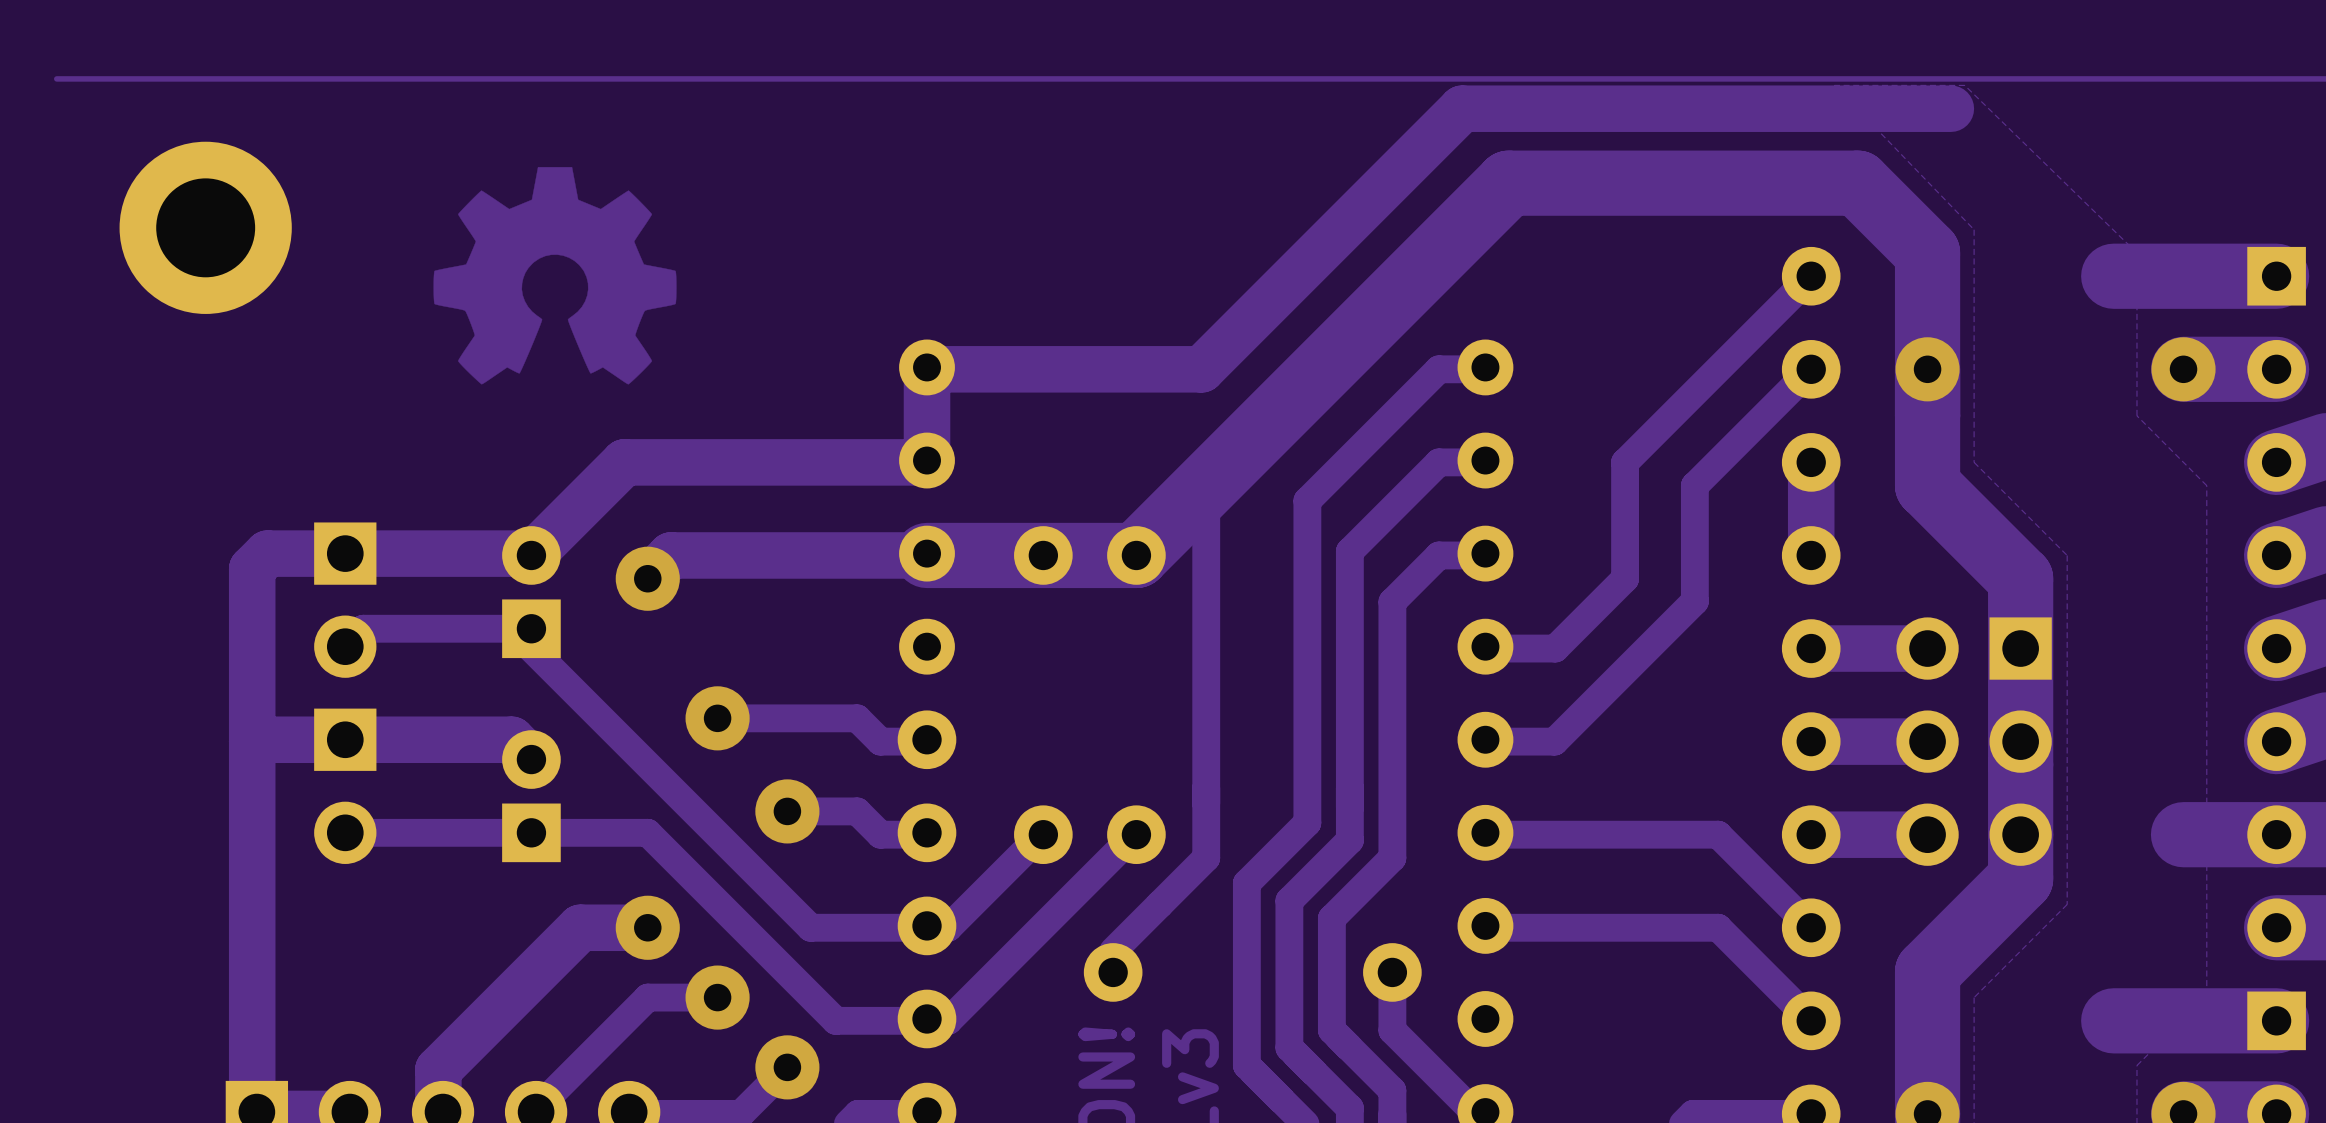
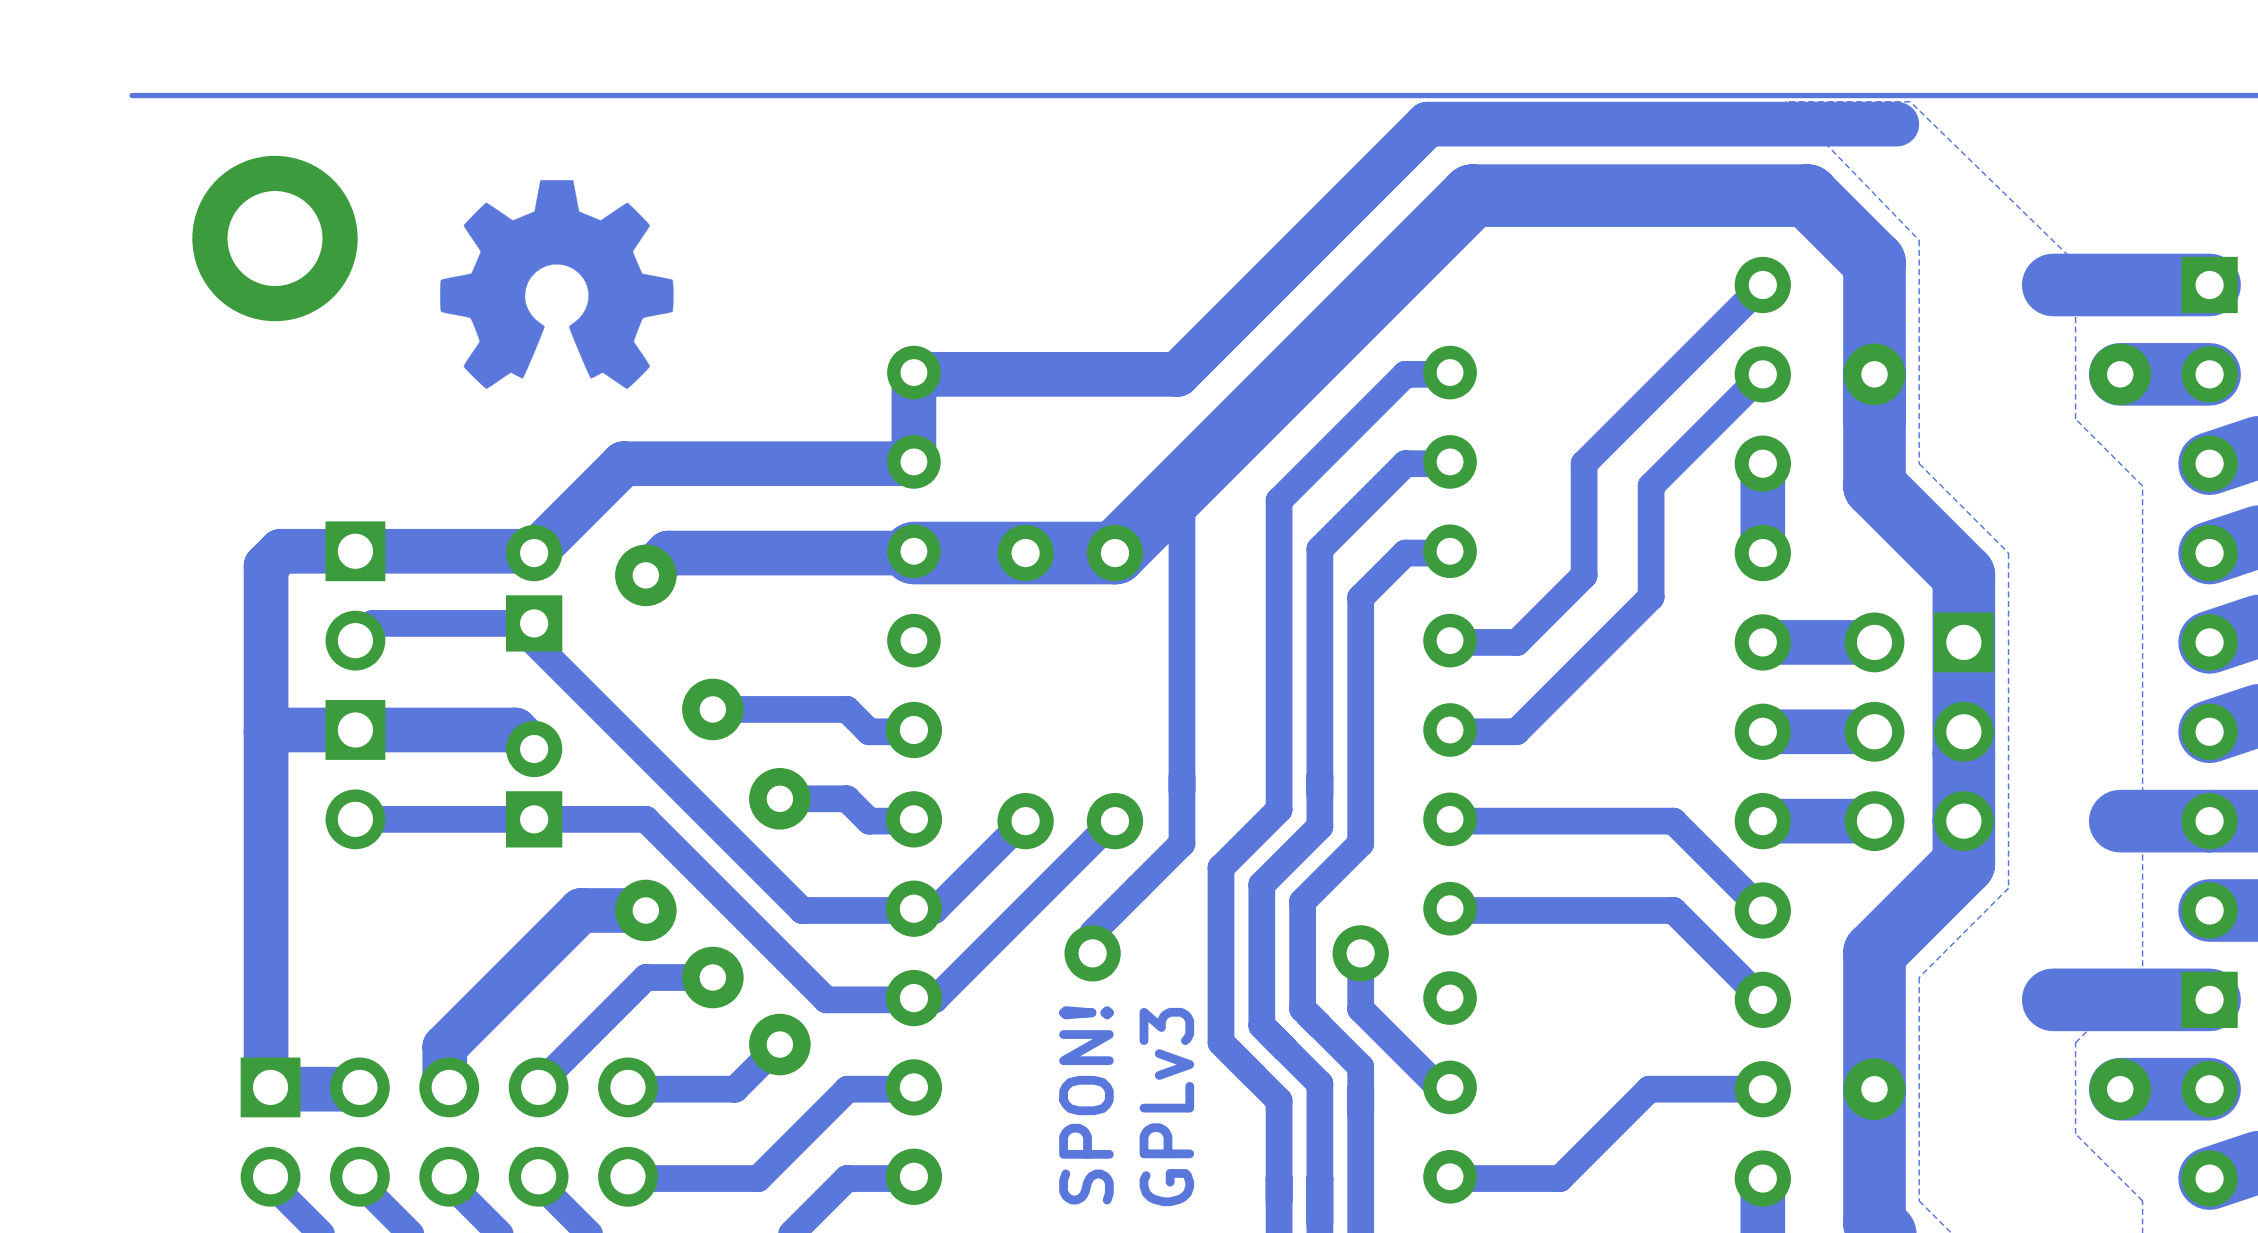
track: (112, 78) (56, 78) -> none
part position: (205, 227) -> (275, 238)

